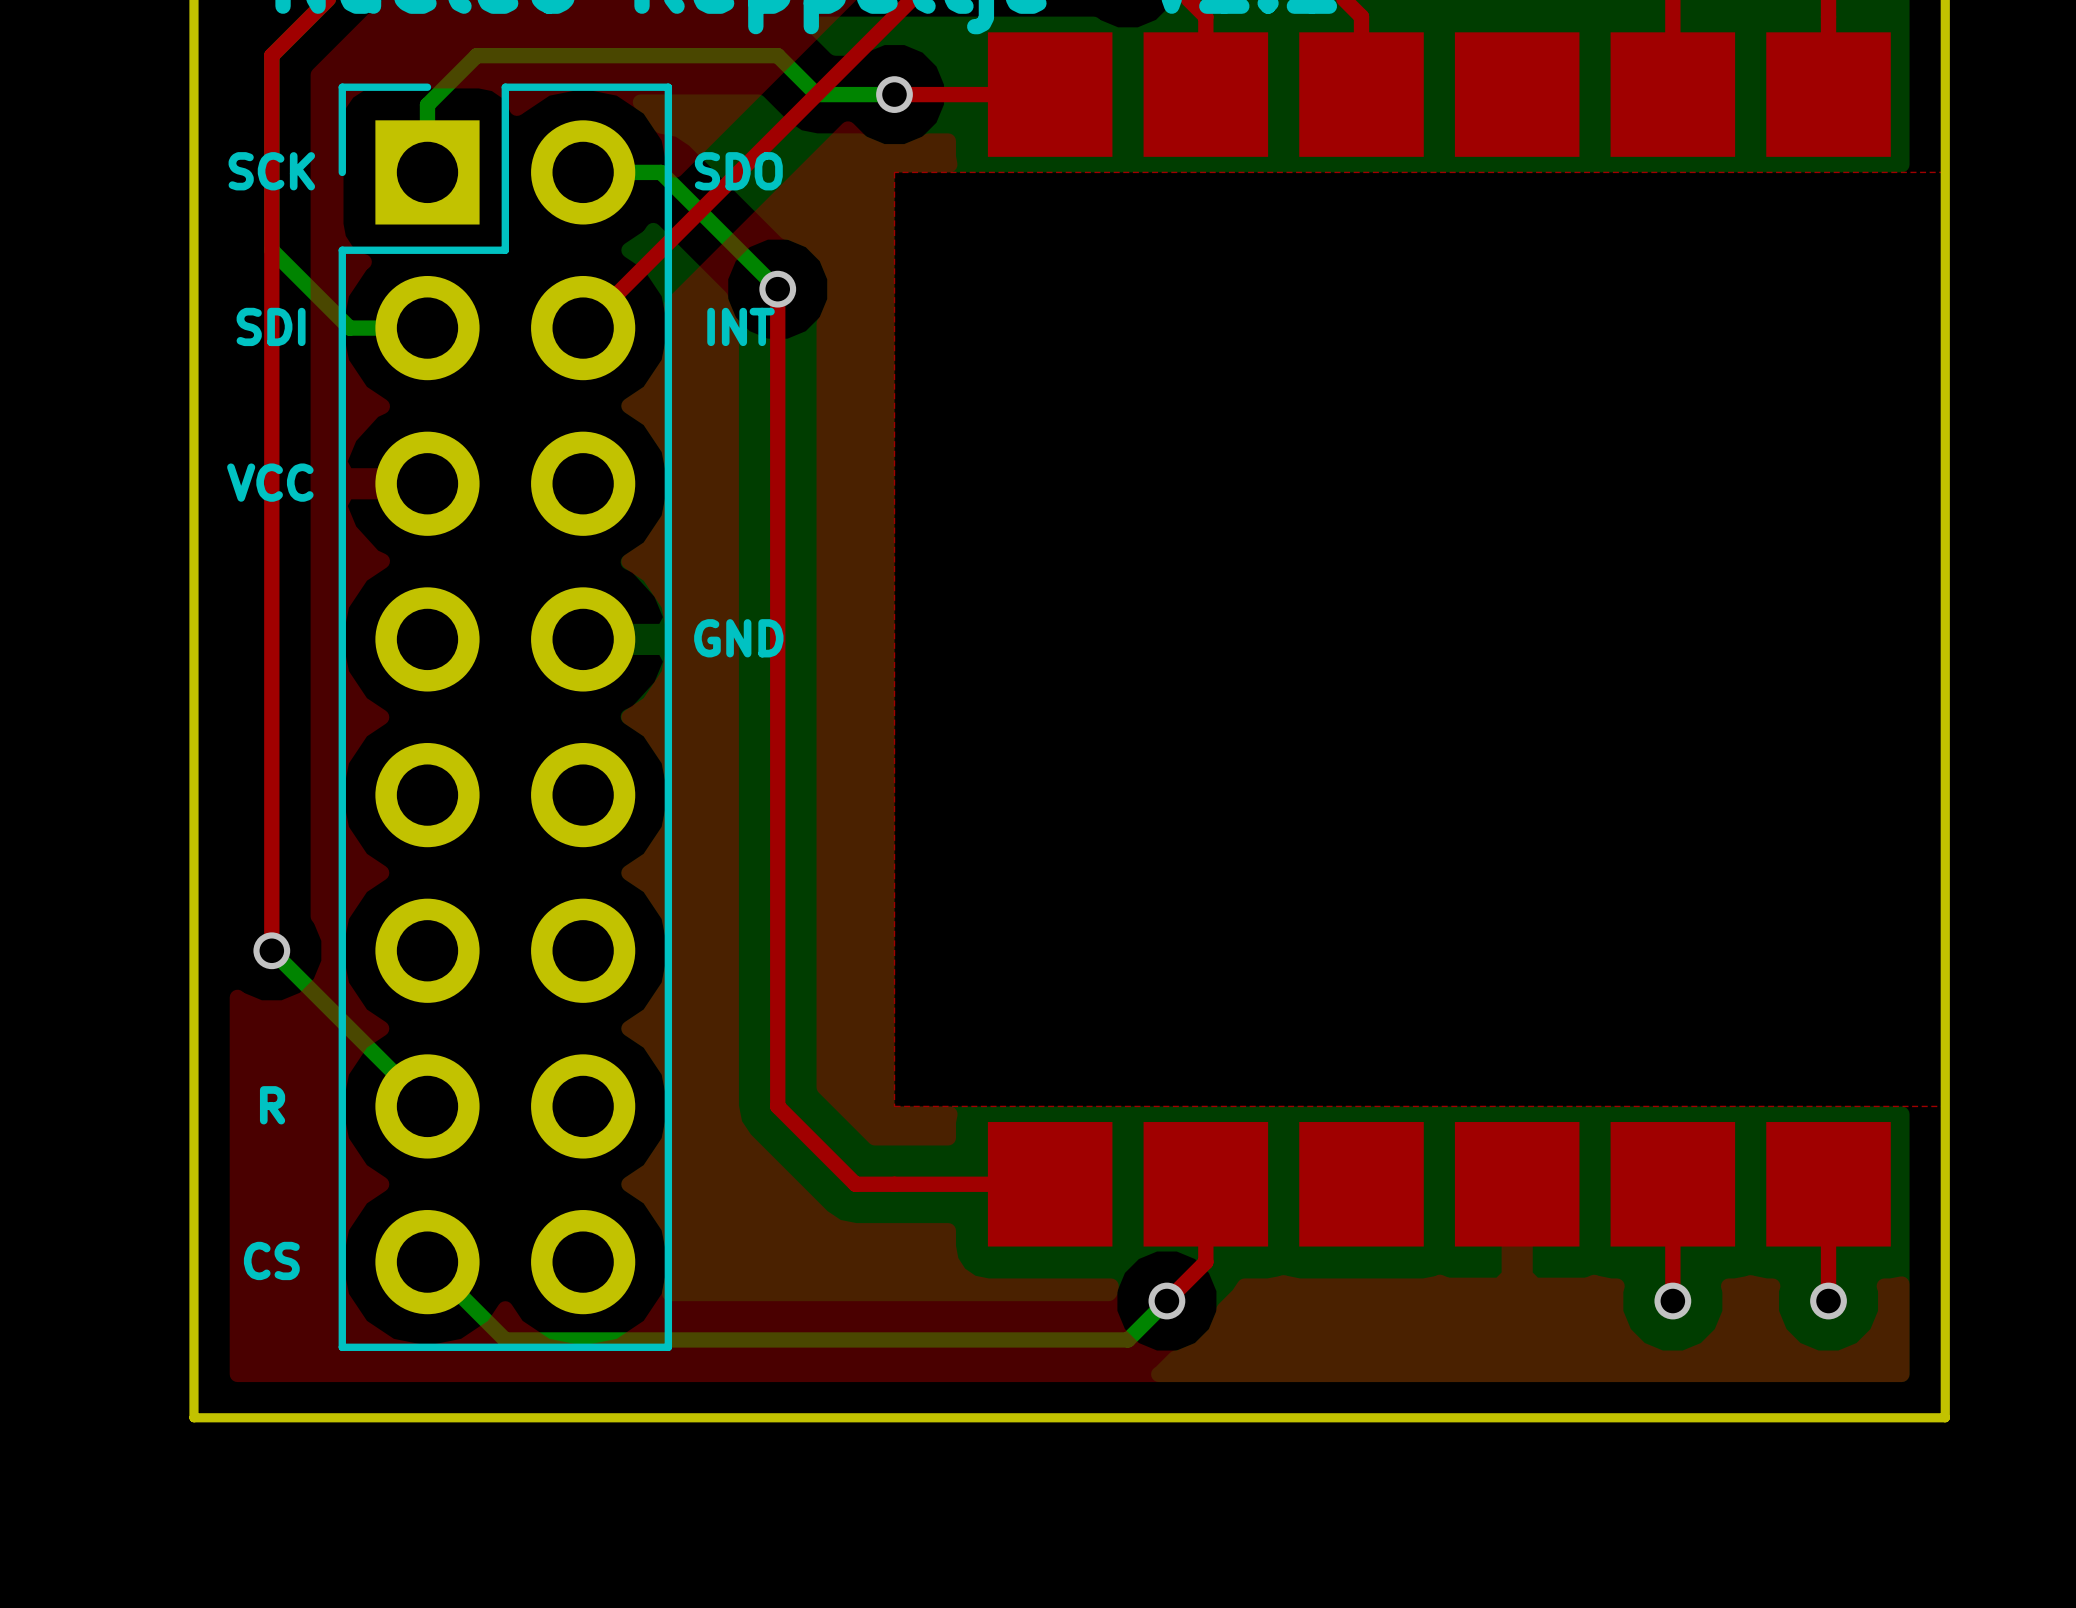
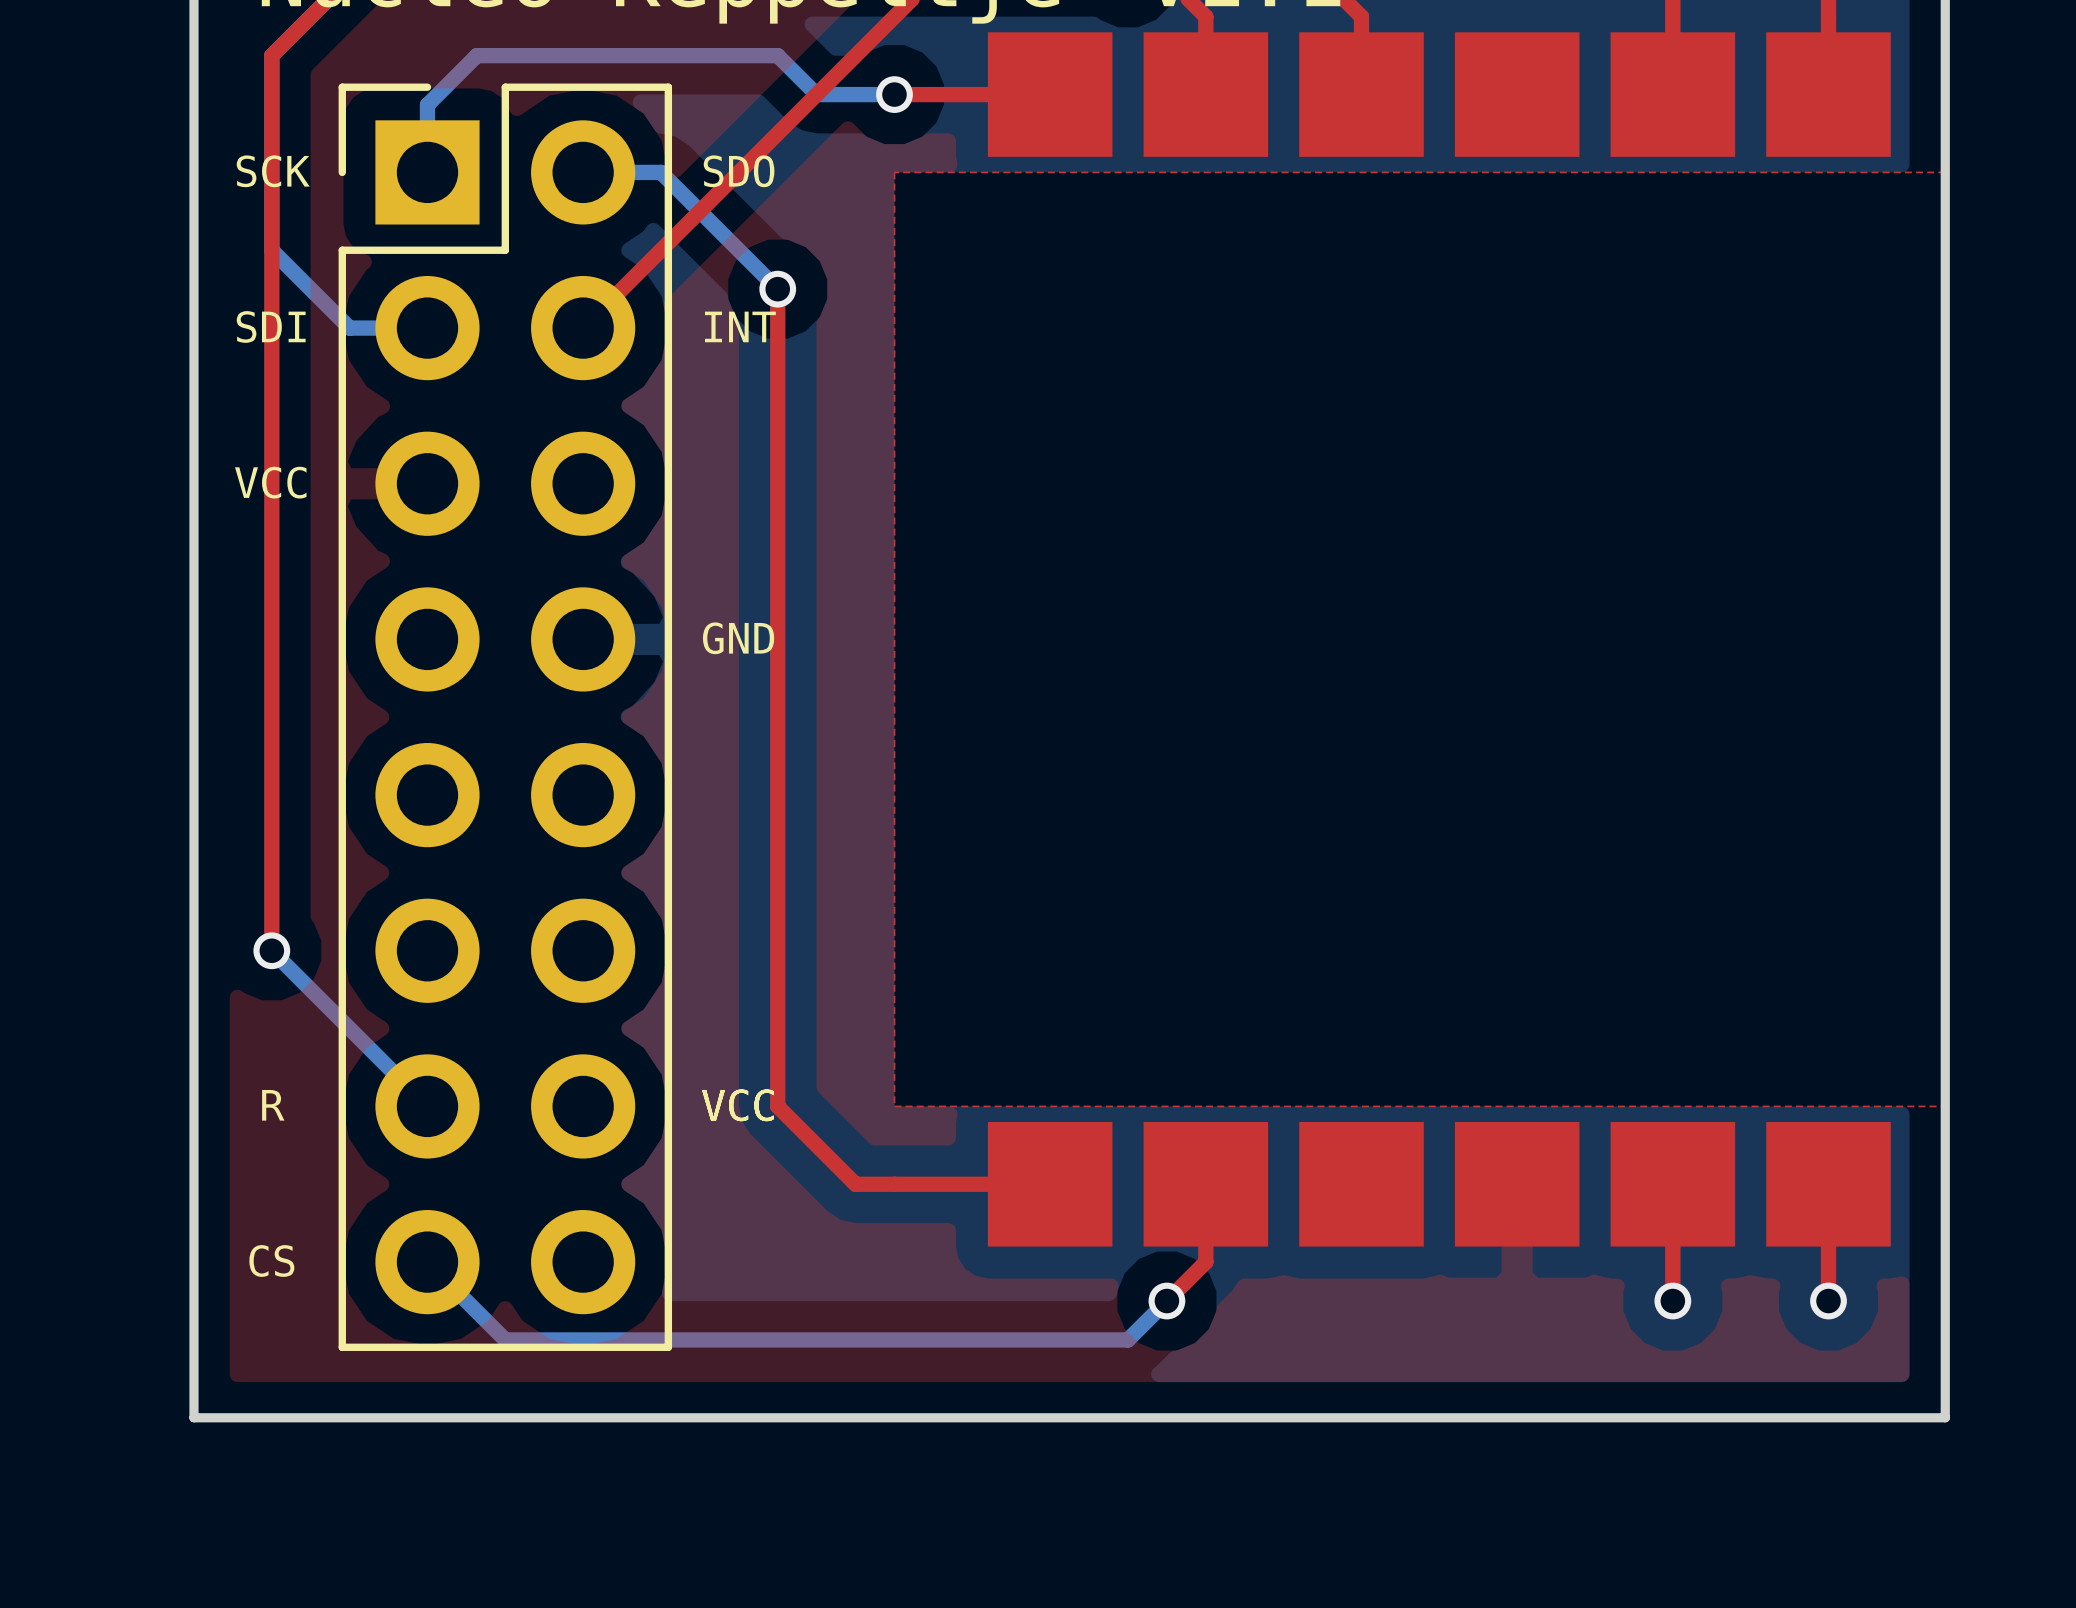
text: none -> VCC (737, 1105)

